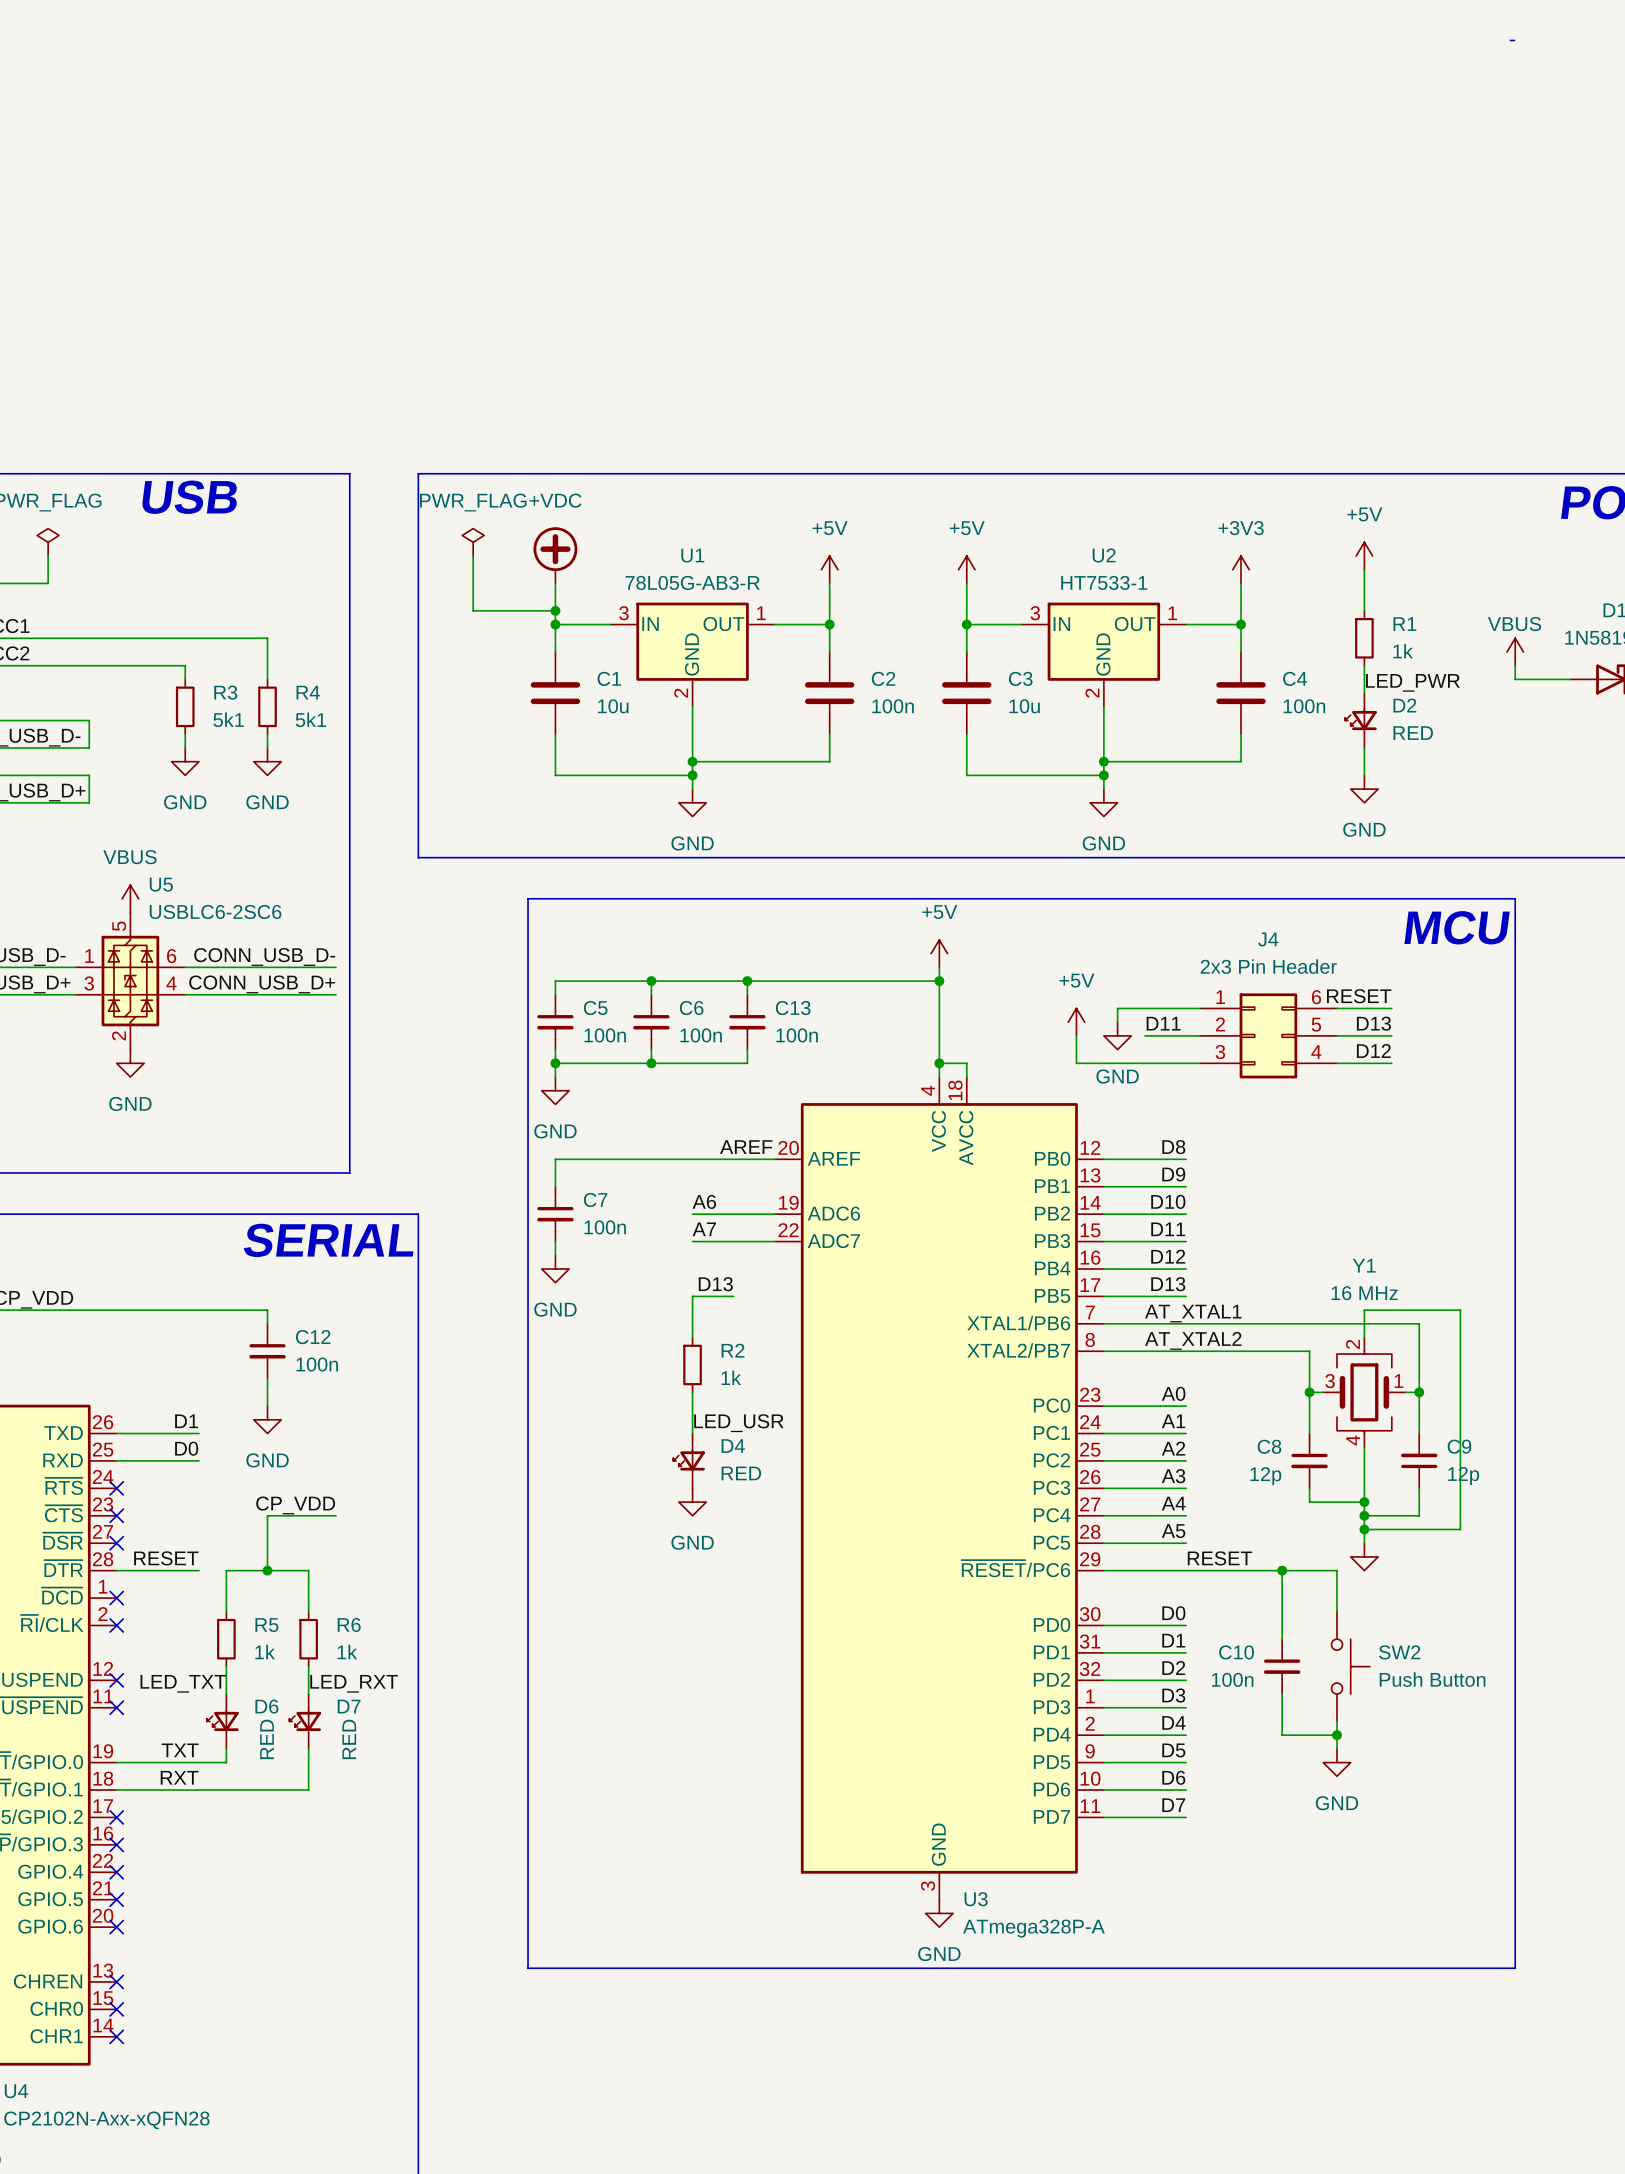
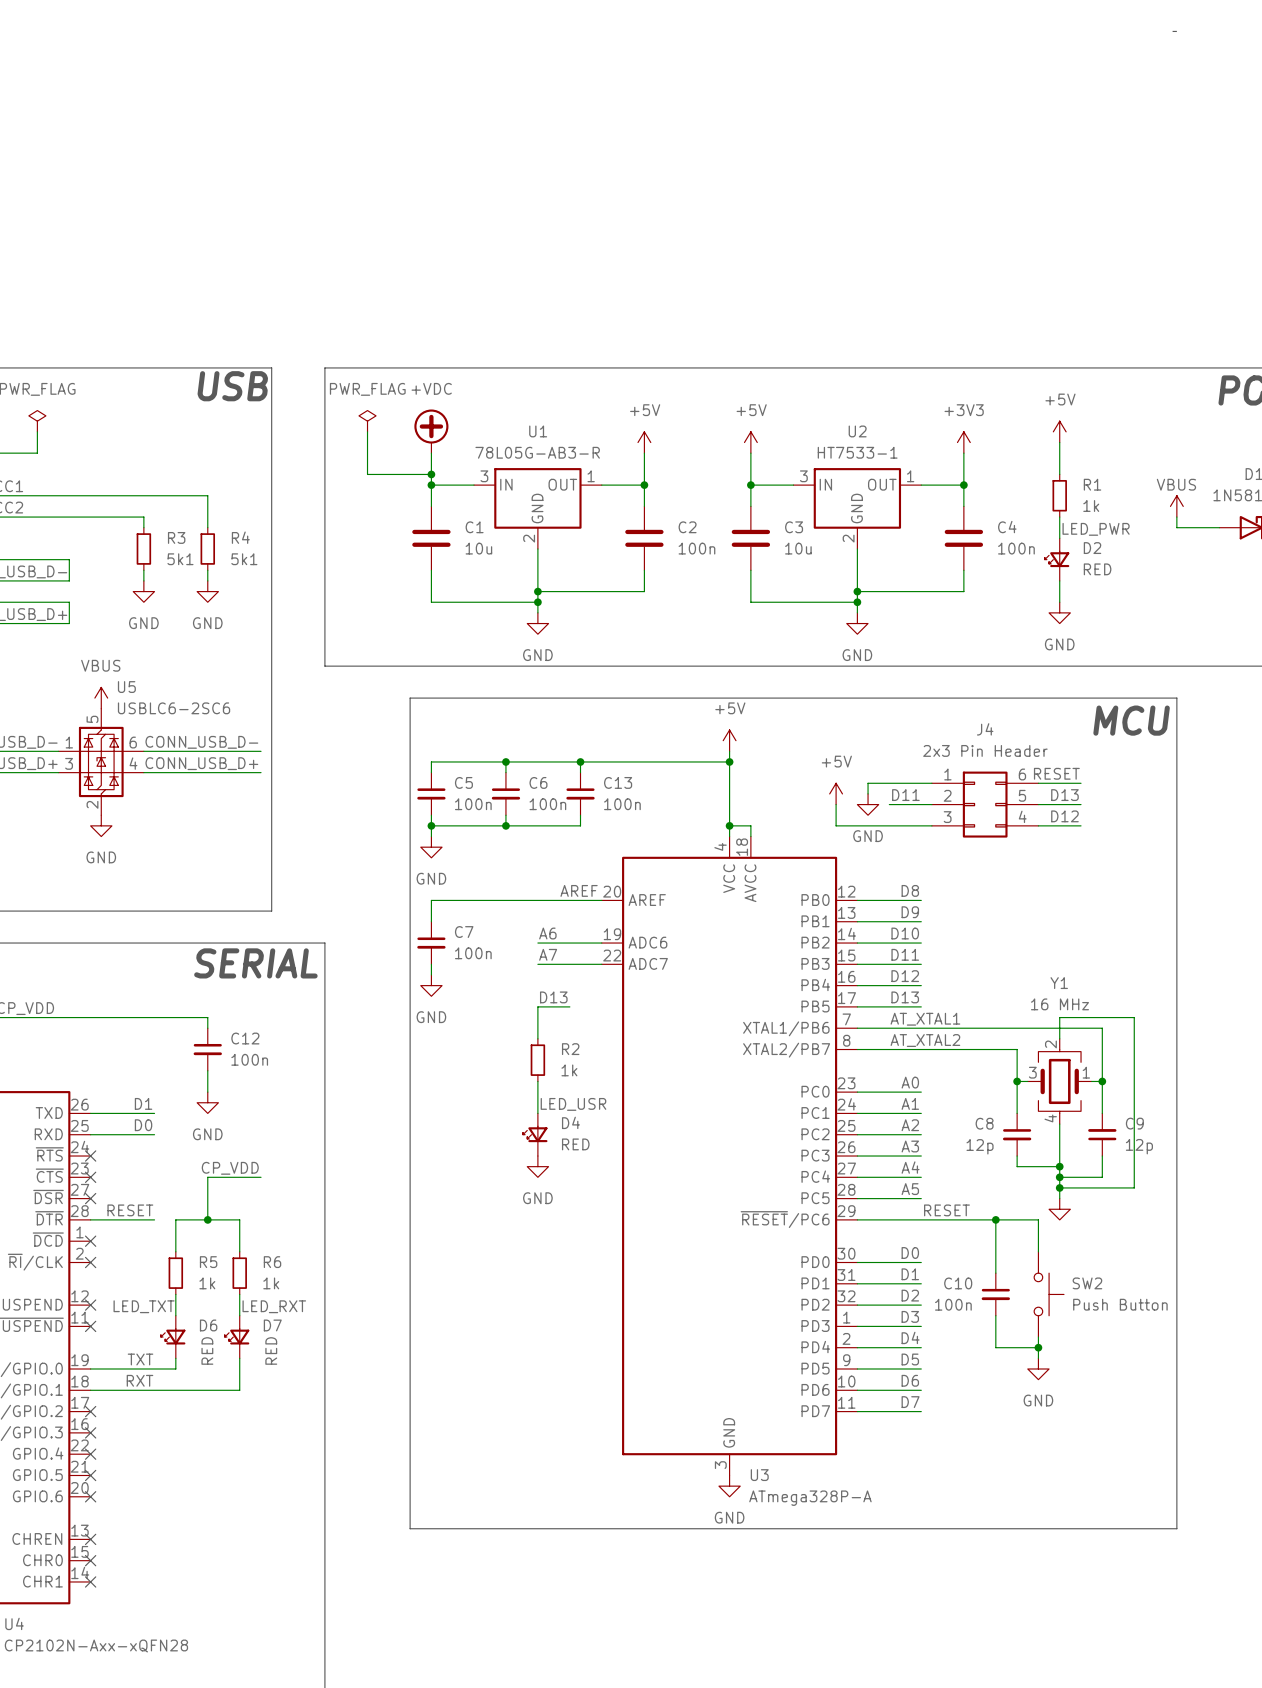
text position: USB (189, 497) -> USB (232, 386)

